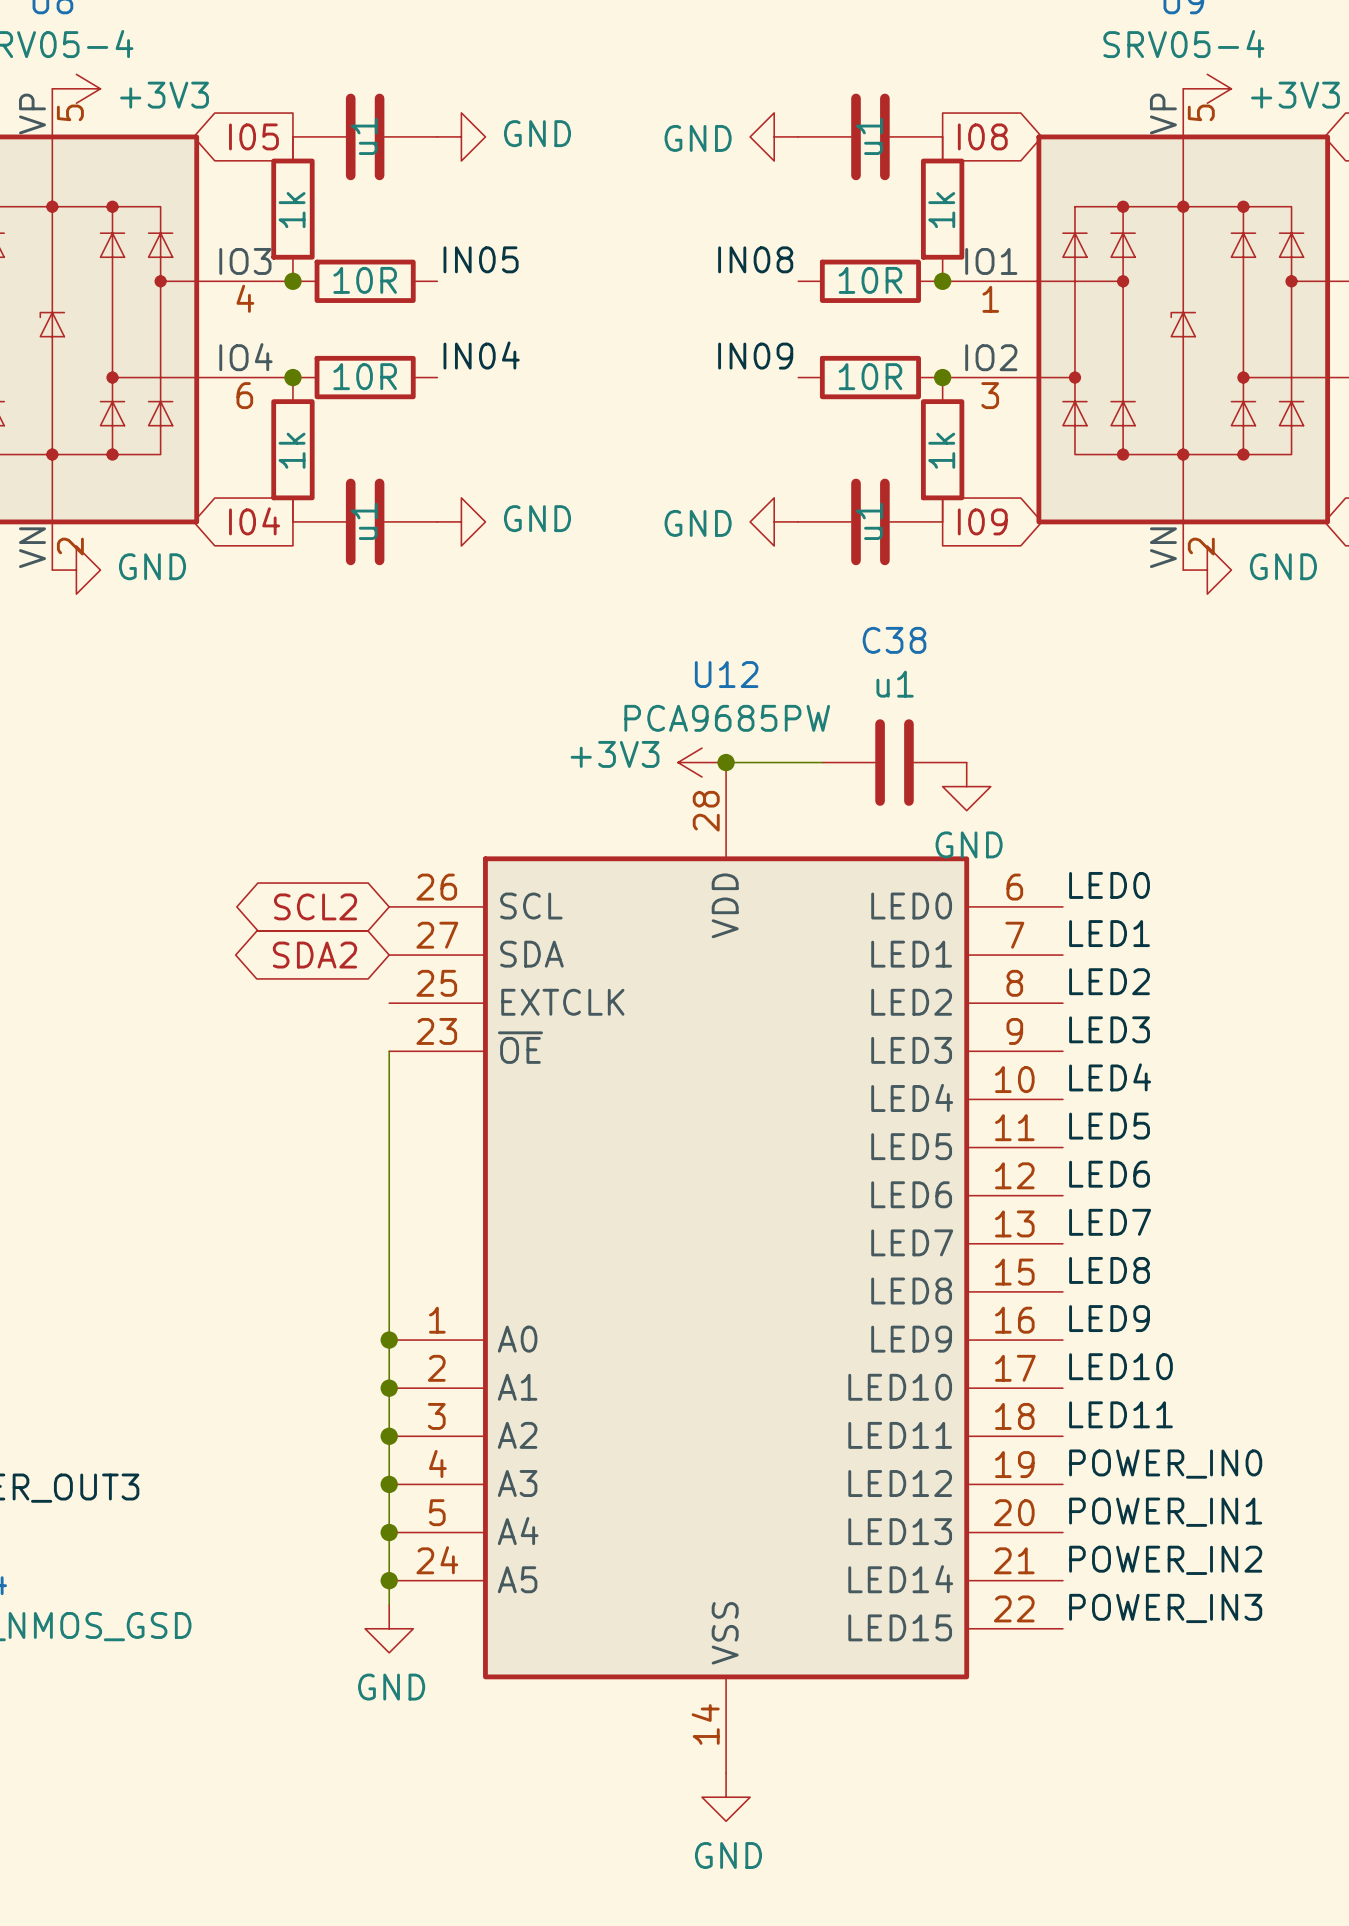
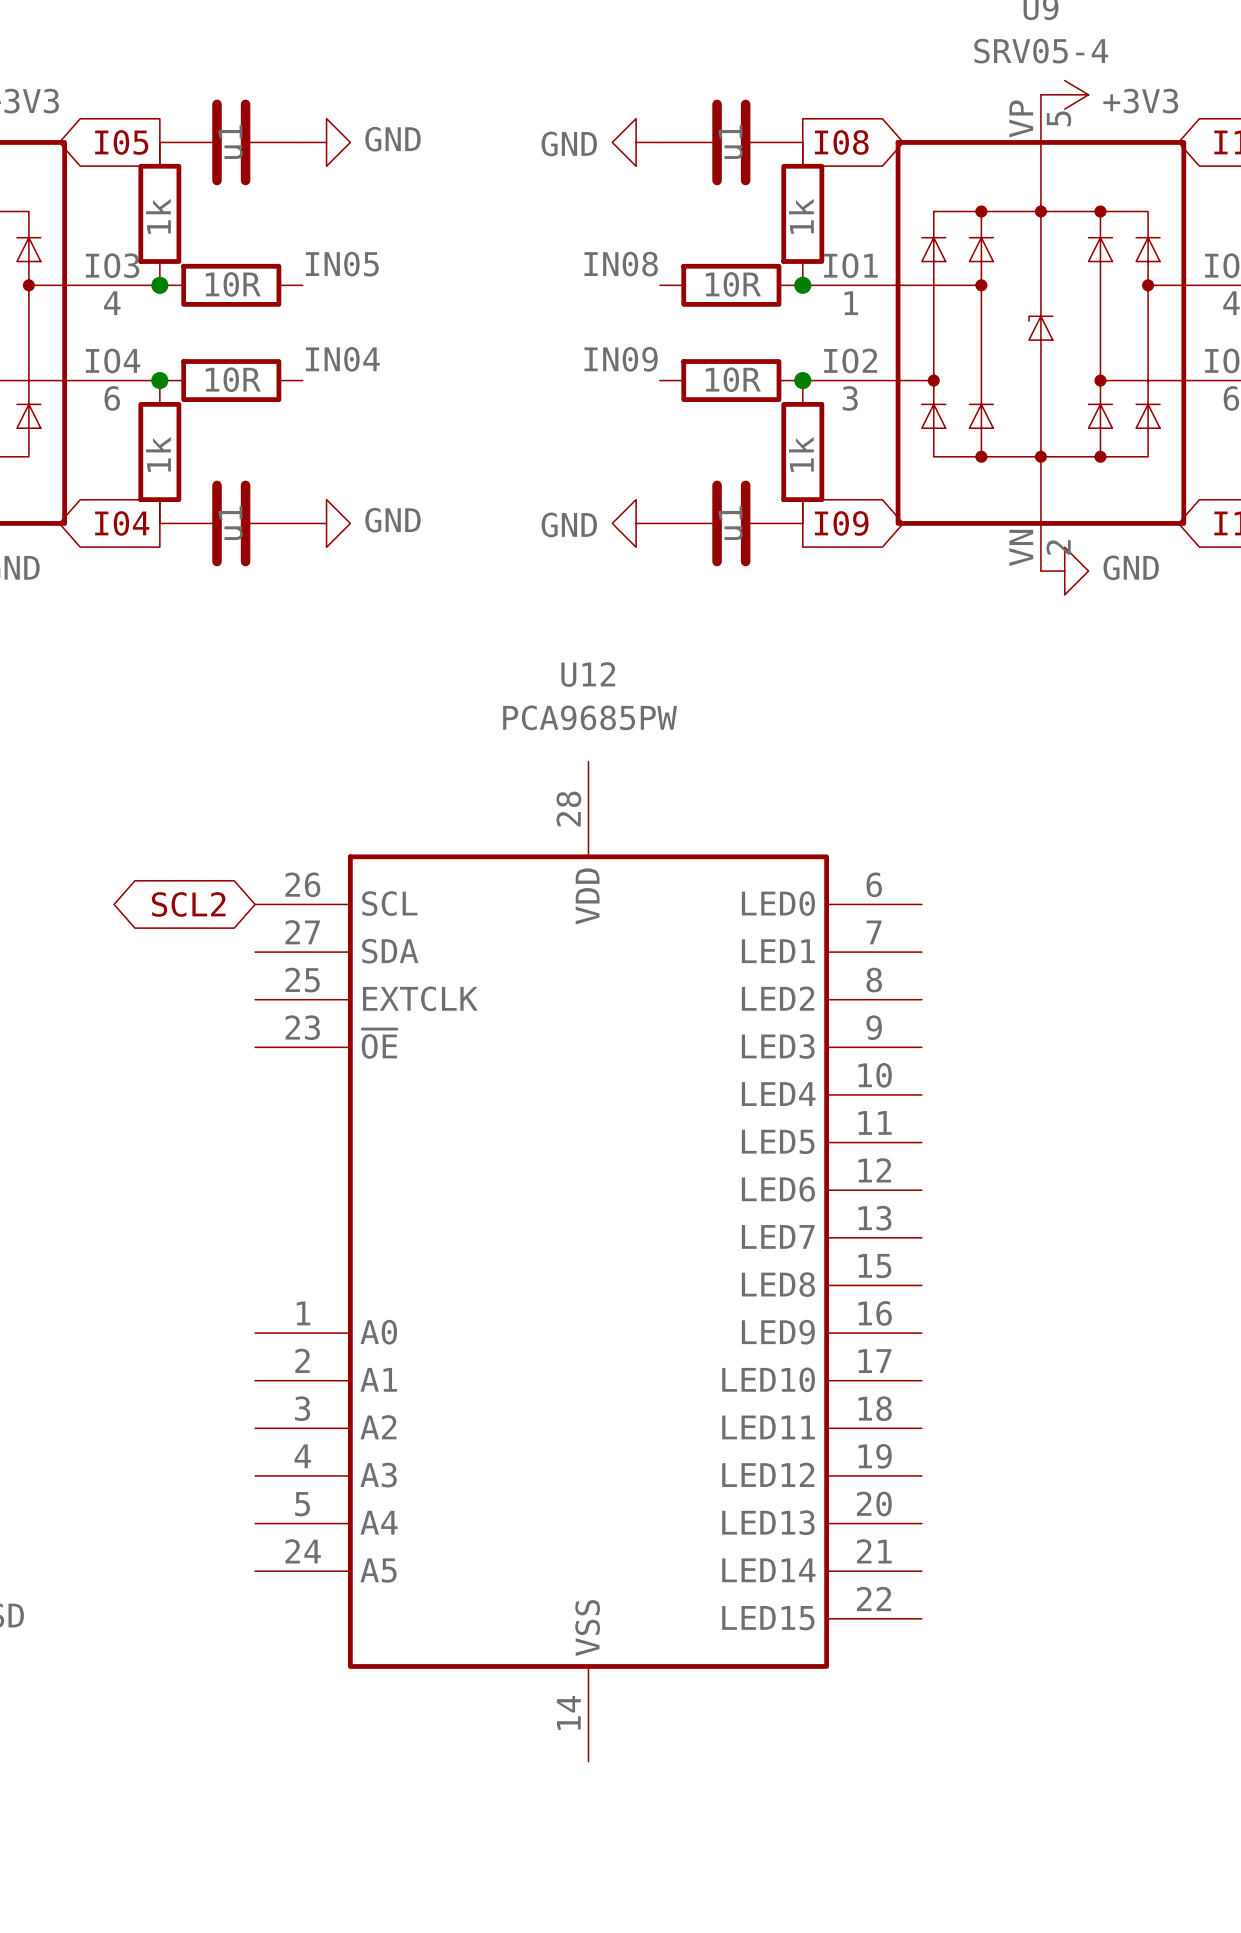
power symbol: +3V3 (702, 762) -> none
wire: (726, 762) (822, 762) -> none
junction: (726, 762) -> none
C38: u1 (894, 762) -> none
power symbol: GND (966, 786) -> none
label: LED0 (1109, 885) -> none
label: LED1 (1109, 933) -> none
global label: SDA2 (314, 955) -> none
label: LED2 (1109, 981) -> none
label: LED3 (1109, 1029) -> none
wire: (389, 1051) (389, 1604) -> none
label: LED4 (1110, 1077) -> none
label: LED5 (1109, 1126) -> none
label: LED6 (1109, 1174) -> none
label: LED7 (1110, 1222) -> none
label: LED8 (1109, 1270) -> none
label: LED9 (1109, 1318) -> none
junction: (389, 1340) -> none
label: LED10 (1120, 1366) -> none
junction: (389, 1388) -> none
label: LED11 (1120, 1414) -> none
junction: (389, 1436) -> none
label: POWER_IN0 (1165, 1464) -> none
junction: (389, 1484) -> none
label: POWER_IN1 (1165, 1512) -> none
junction: (389, 1532) -> none
label: POWER_IN2 (1165, 1560) -> none
junction: (389, 1580) -> none
label: POWER_IN3 (1165, 1608) -> none
power symbol: GND (389, 1628) -> none
power symbol: GND (726, 1797) -> none

